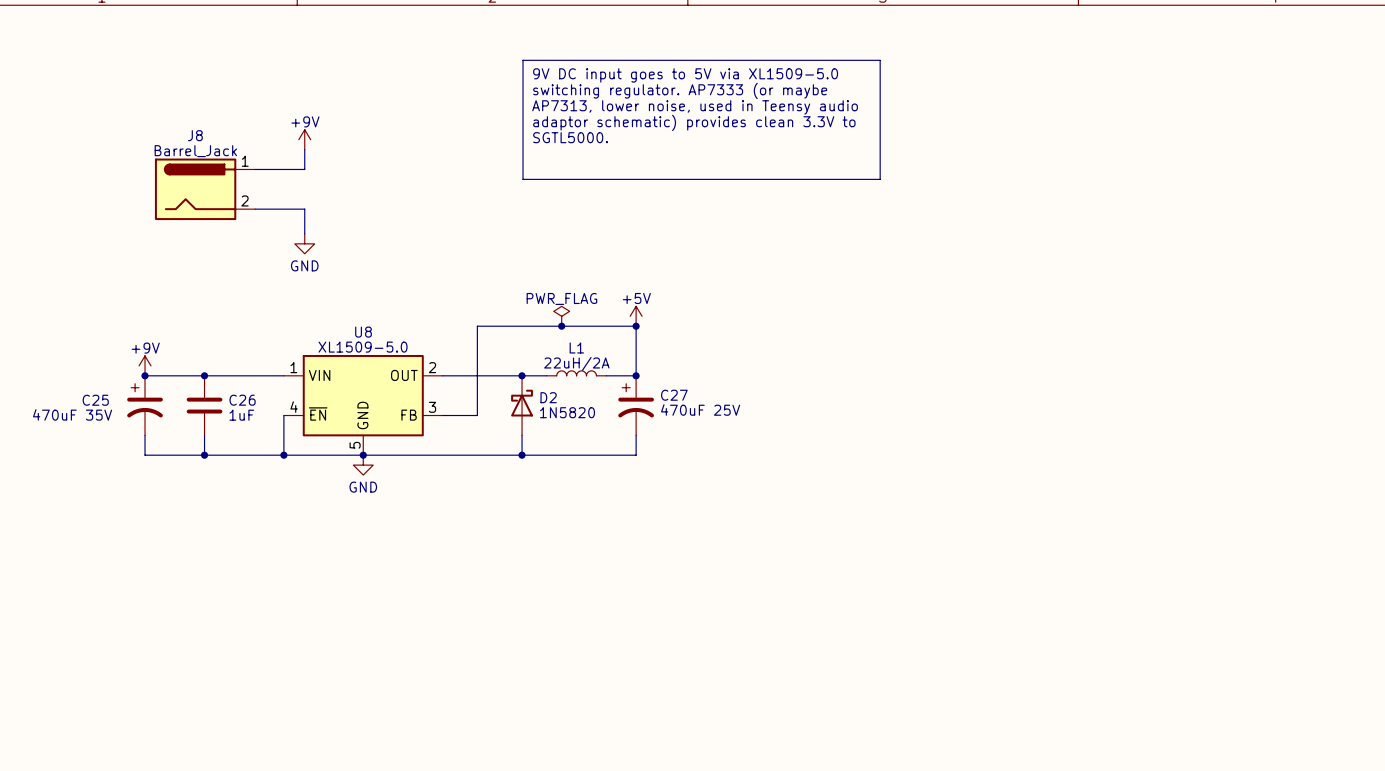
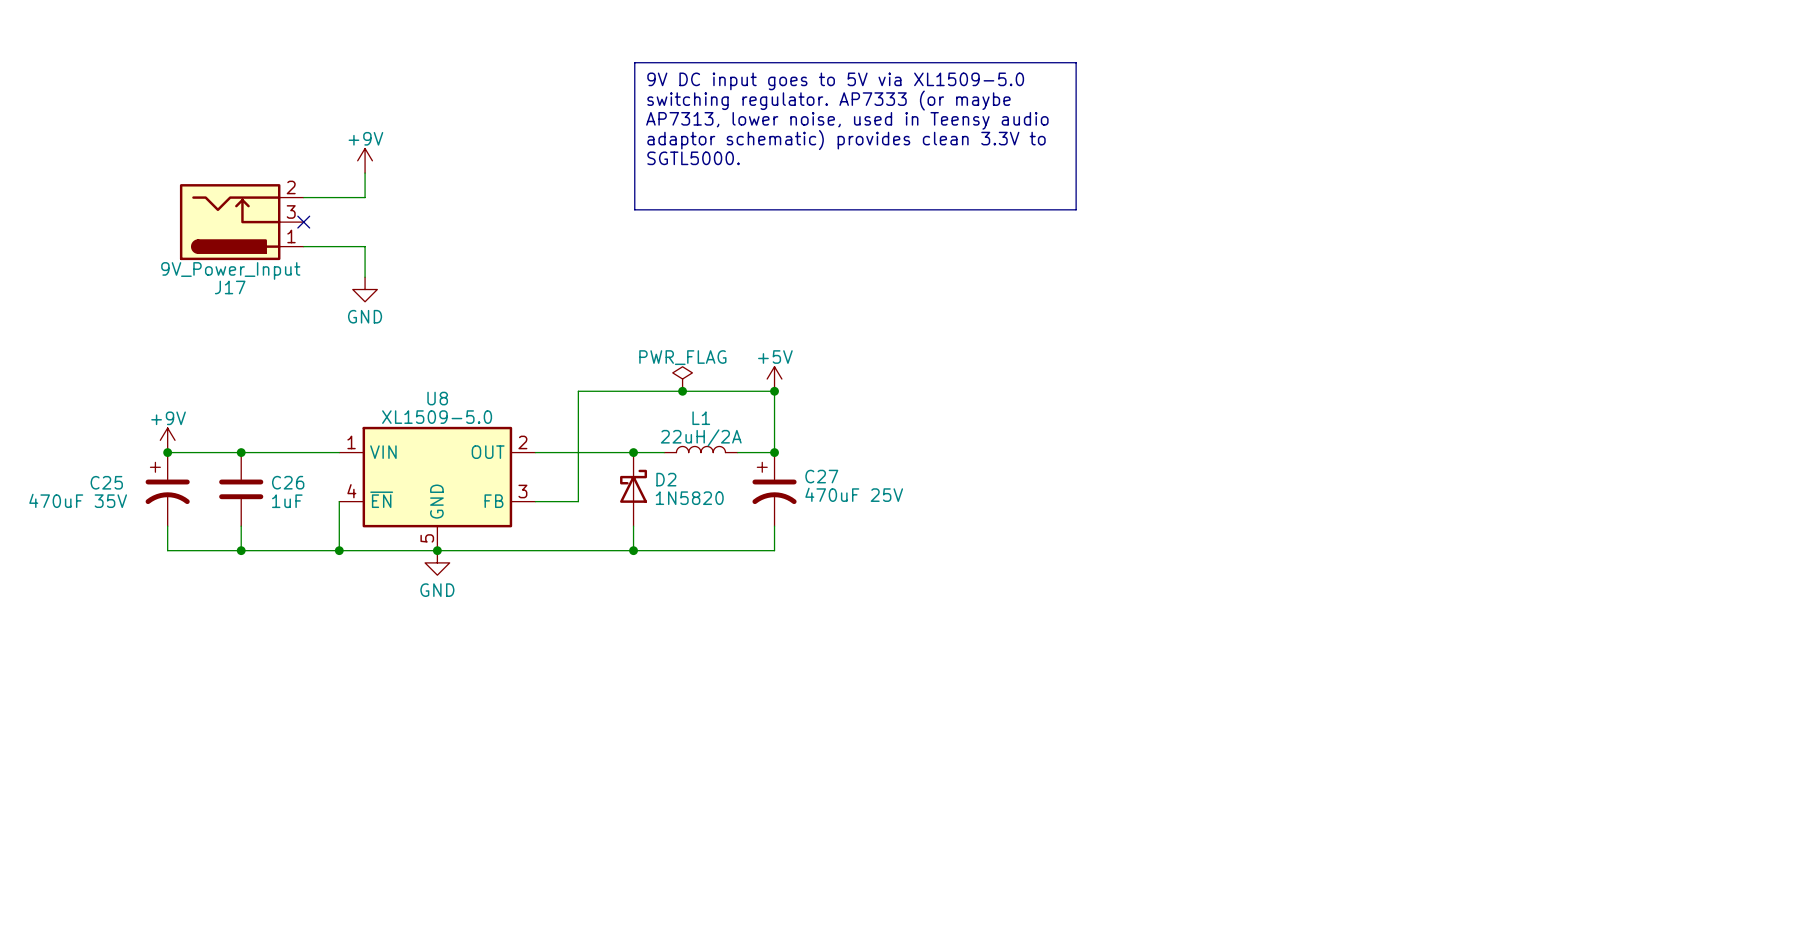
J8: Barrel_Jack (205, 189) -> none
J17: none -> 9V_Power_Input (241, 222)
no-connect mark: none -> (303, 222)

